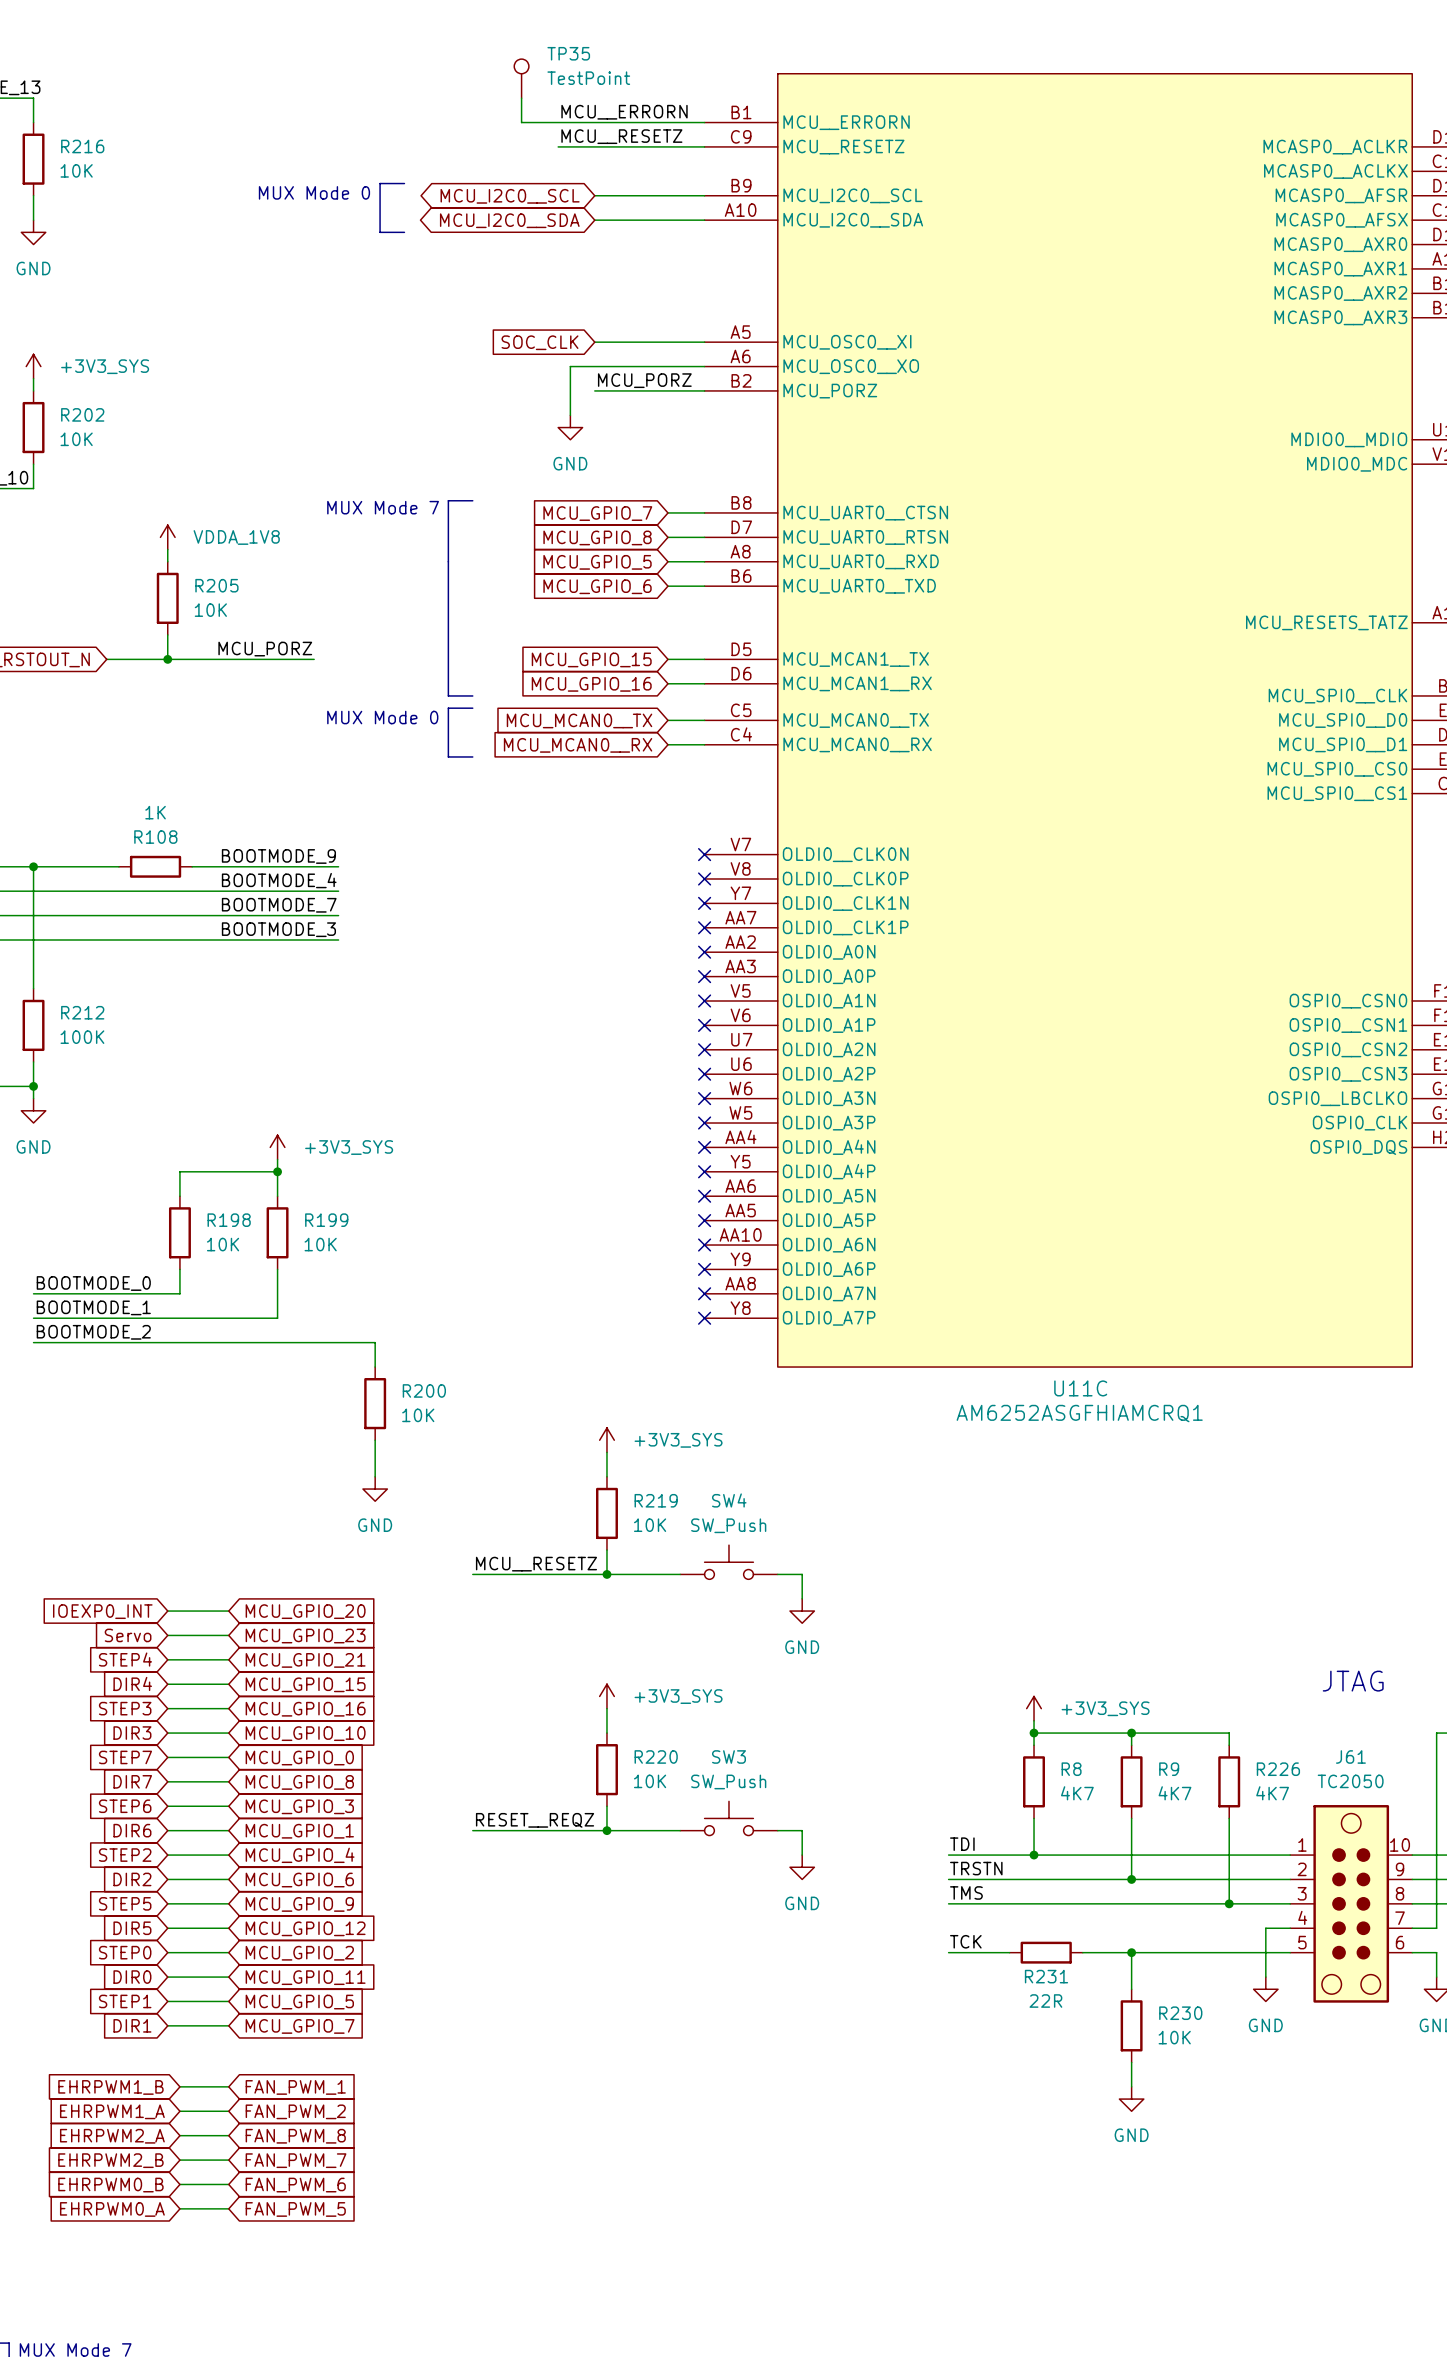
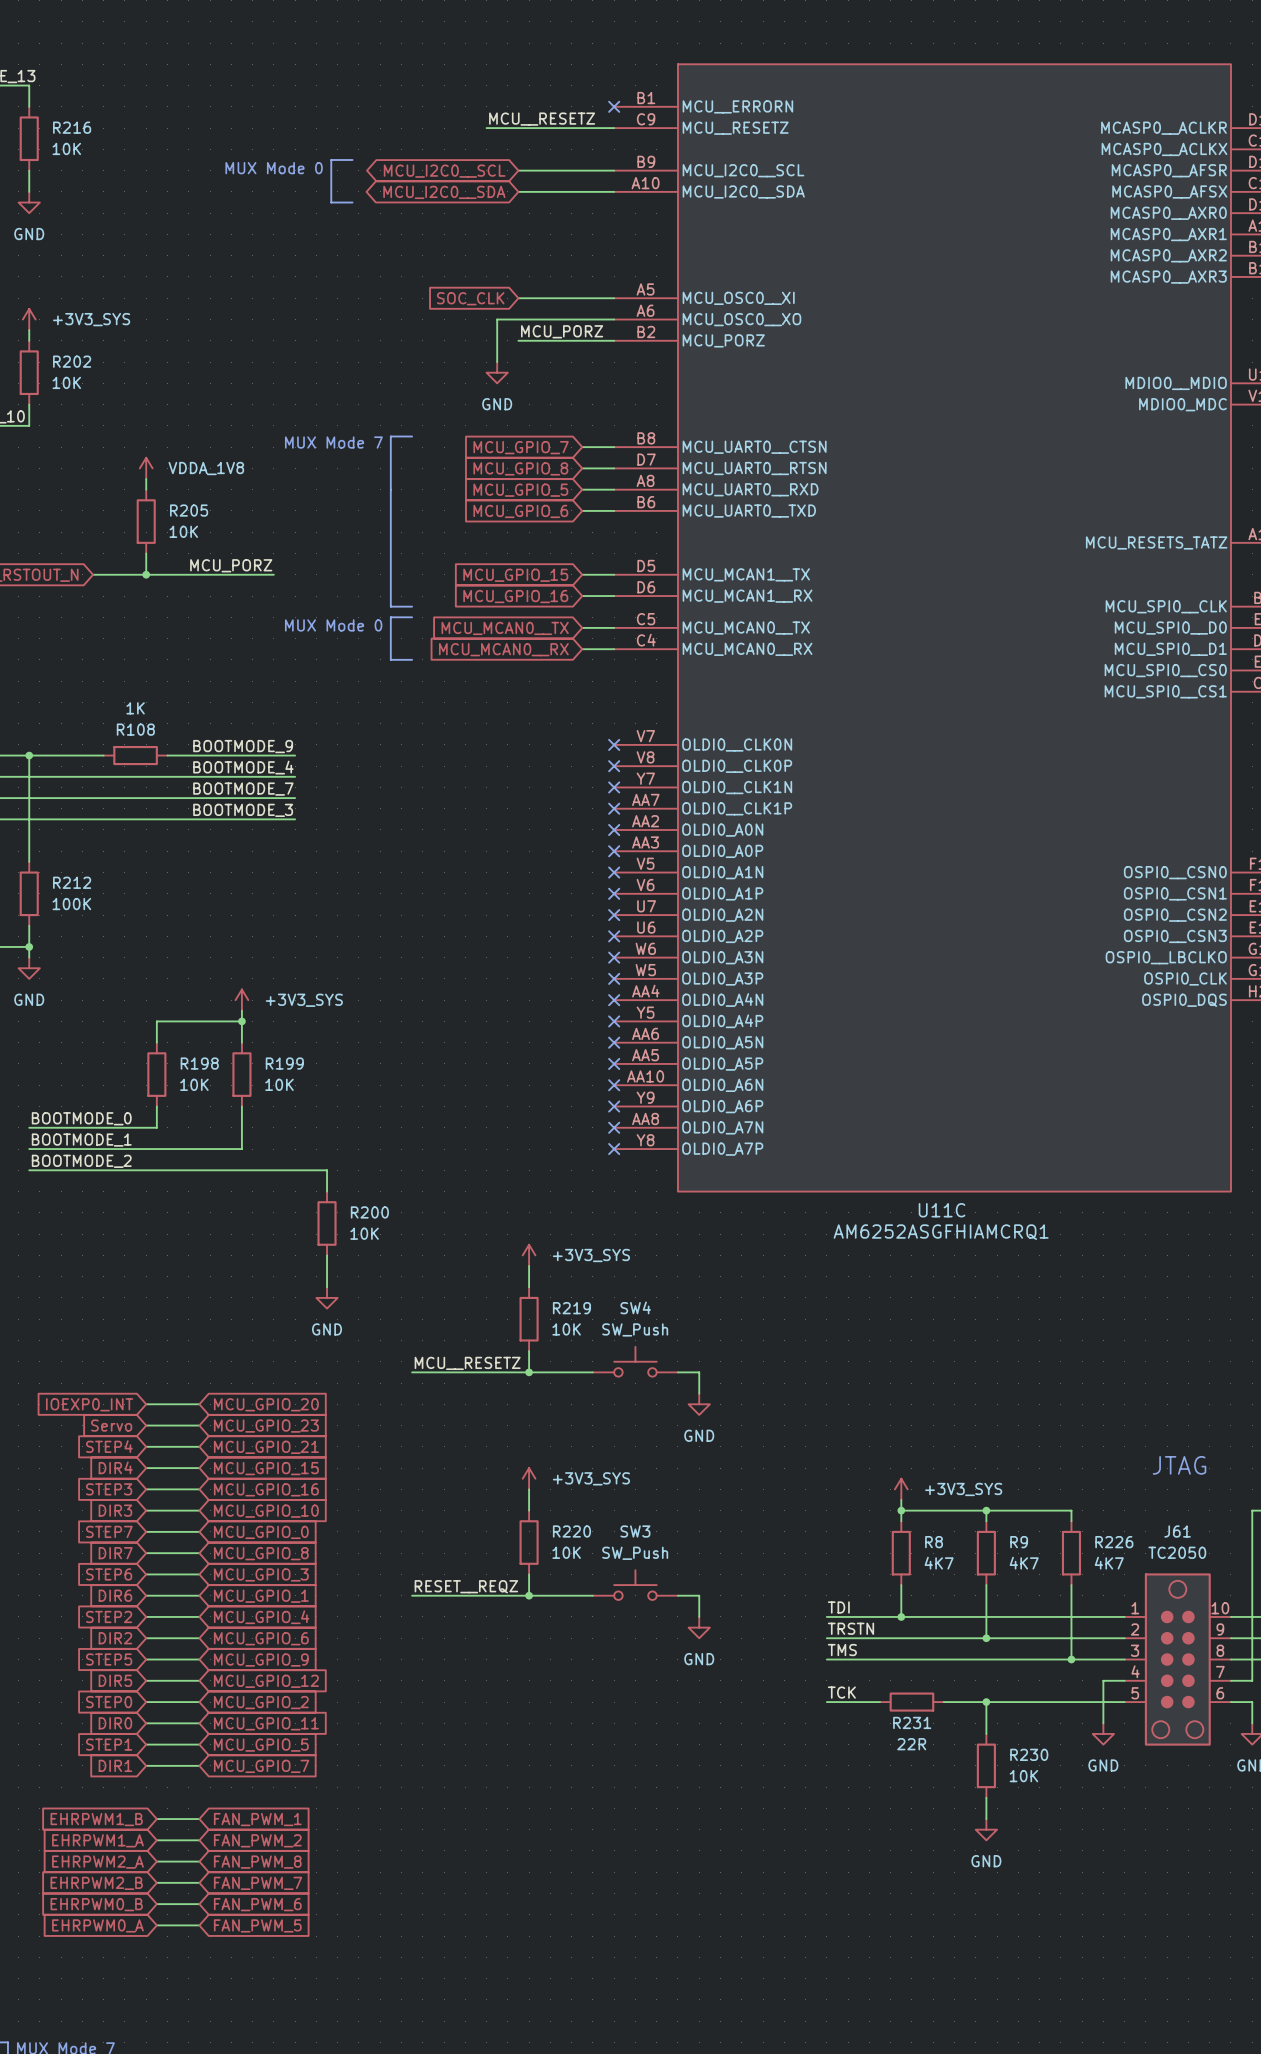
TP35: TestPoint (521, 78) -> none
wire: (521, 98) (521, 122) (704, 122) -> none
label: MCU__ERRORN (624, 112) -> none
no-connect mark: none -> (614, 106)

